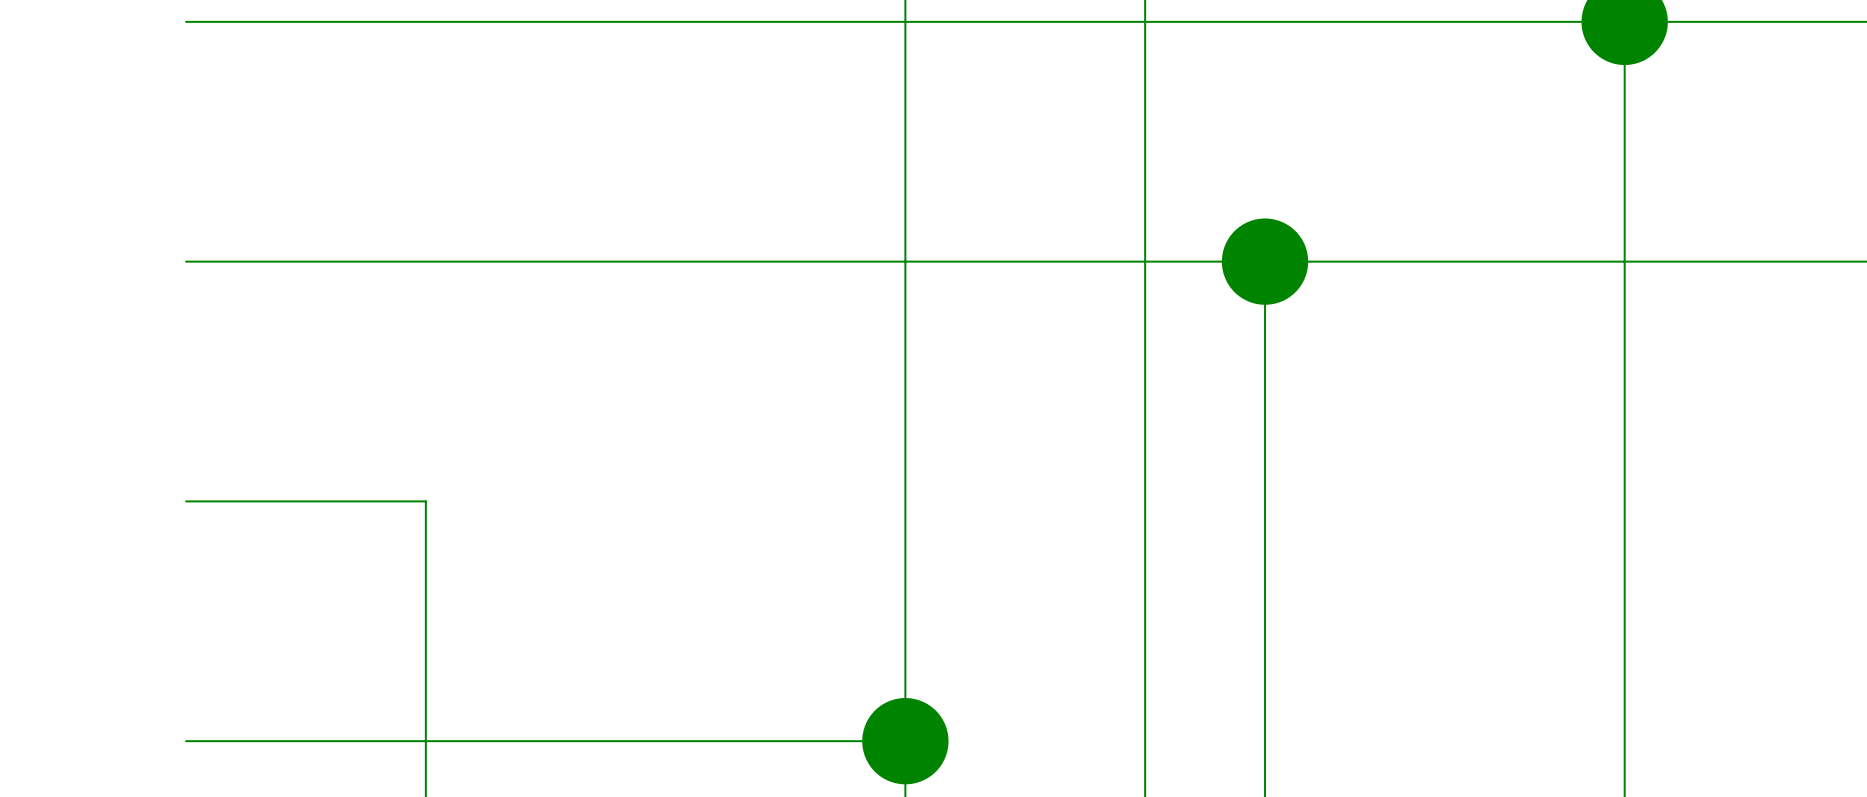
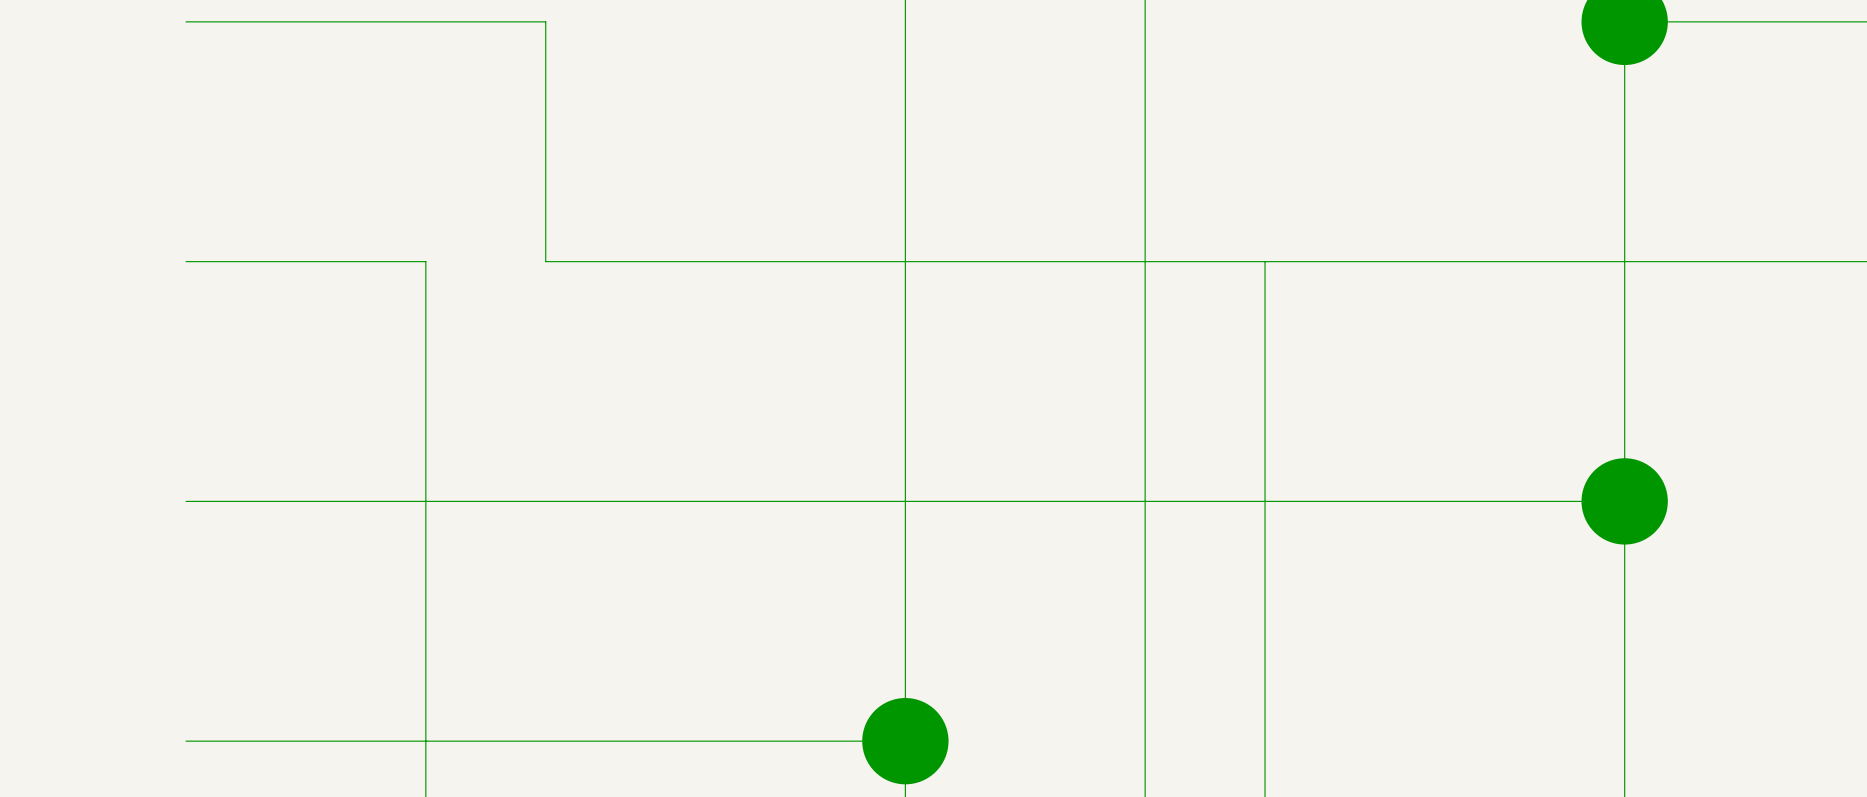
wire: (545, 21) (1624, 21) -> none
wire: (425, 261) (545, 261) -> (545, 21) (545, 261)
wire: none -> (425, 261) (425, 501) (1624, 501)
junction position: (1265, 261) -> (1624, 501)

